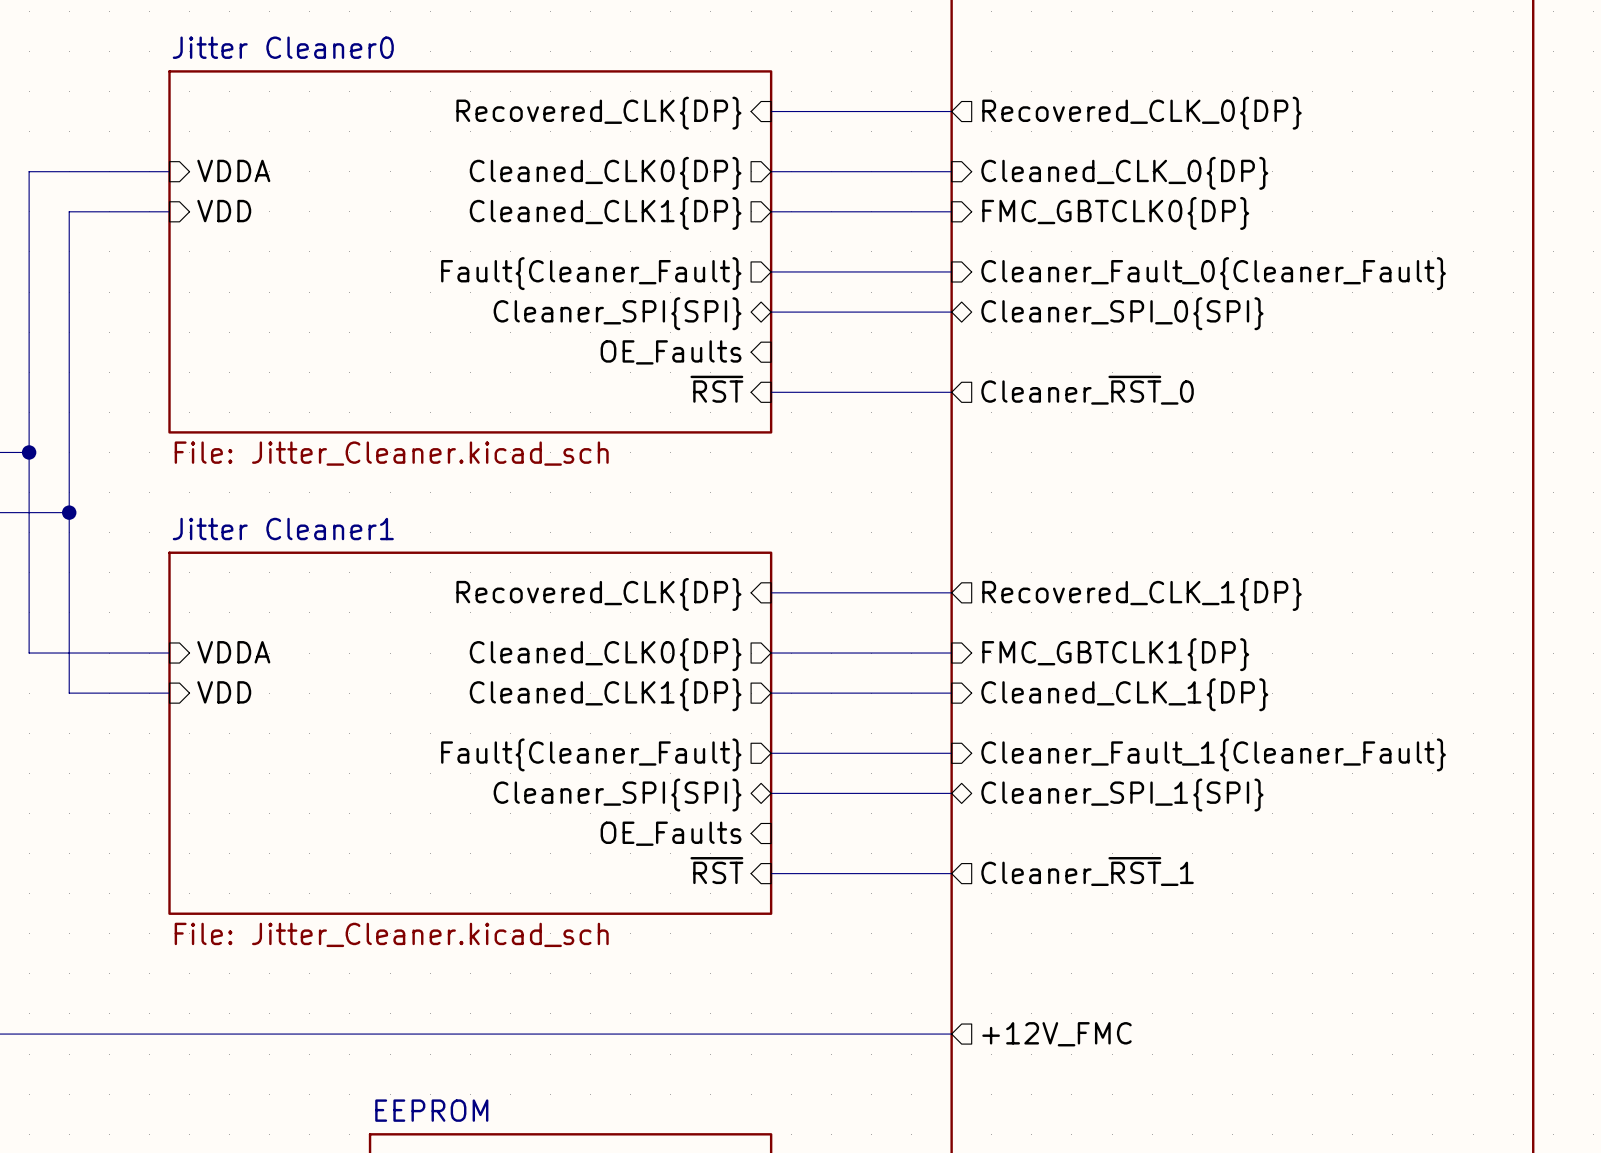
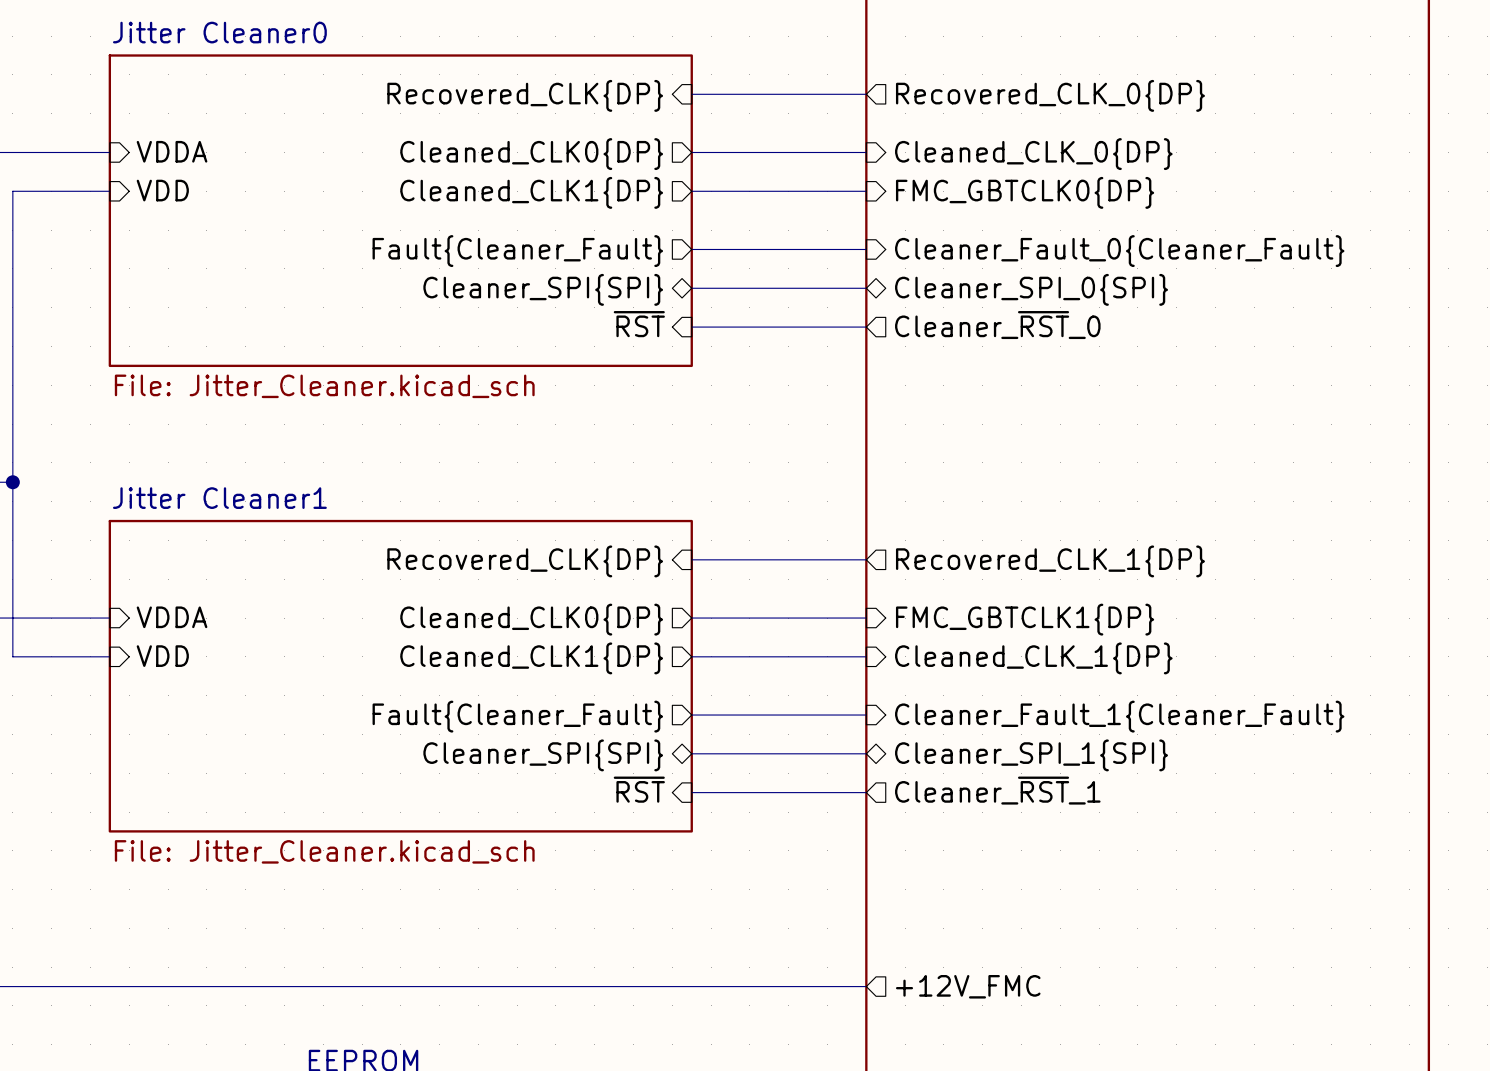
sheet Jitter Cleaner0 shape: [168, 70, 773, 434] -> [108, 54, 693, 368]
sheet pin: OE_Faults (671, 352) -> ~{RST} (639, 324)
sheet pin: ~{RST} (716, 389) -> none
sheet pin position: Cleaner_~{RST}_0 (1087, 390) -> Cleaner_~{RST}_0 (997, 325)
wire: (771, 392) (951, 392) -> (691, 327) (866, 327)
sheet Jitter Cleaner1 shape: [168, 551, 773, 915] -> [108, 519, 693, 833]
sheet pin: OE_Faults (671, 833) -> ~{RST} (639, 789)
sheet pin: ~{RST} (716, 870) -> none
sheet pin position: Cleaner_~{RST}_1 (1087, 871) -> Cleaner_~{RST}_1 (997, 790)
wire: (771, 873) (951, 873) -> (691, 792) (866, 792)

